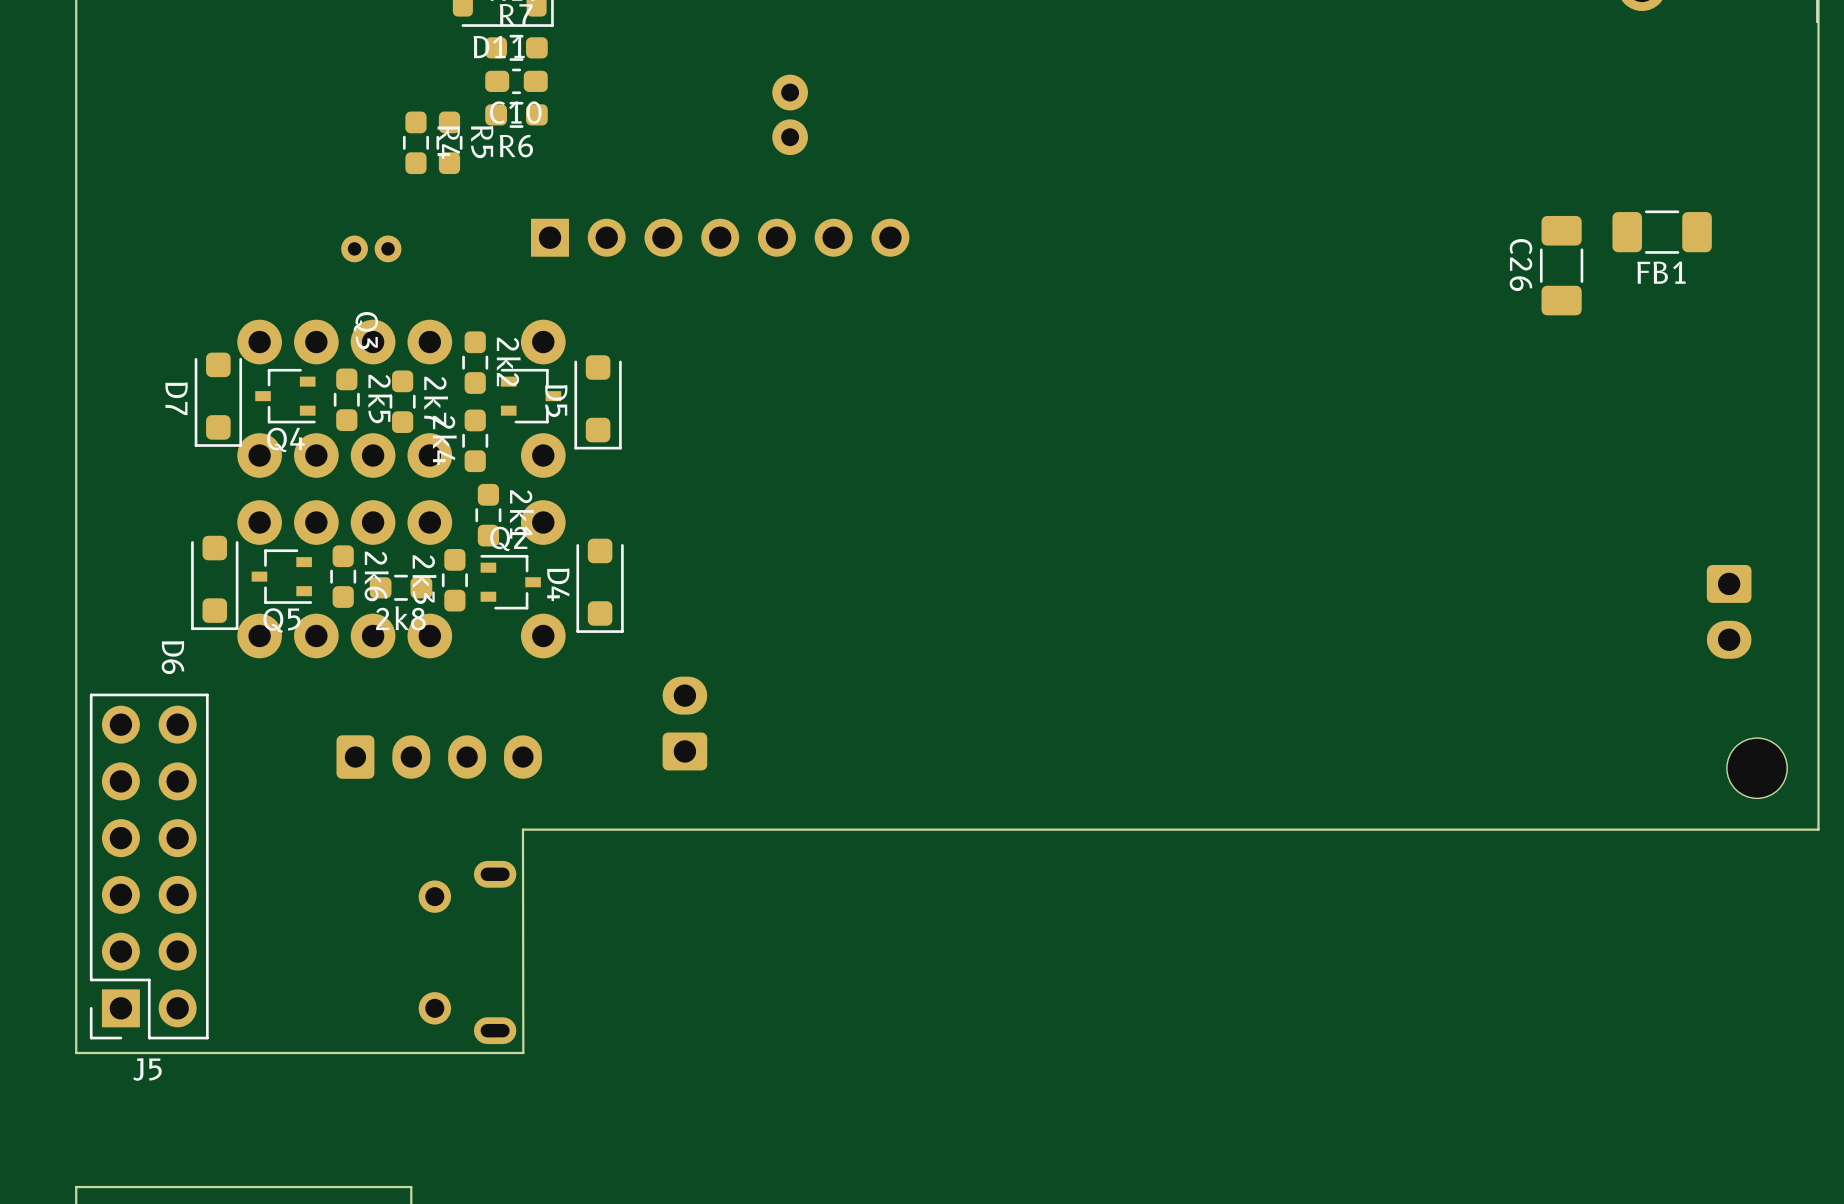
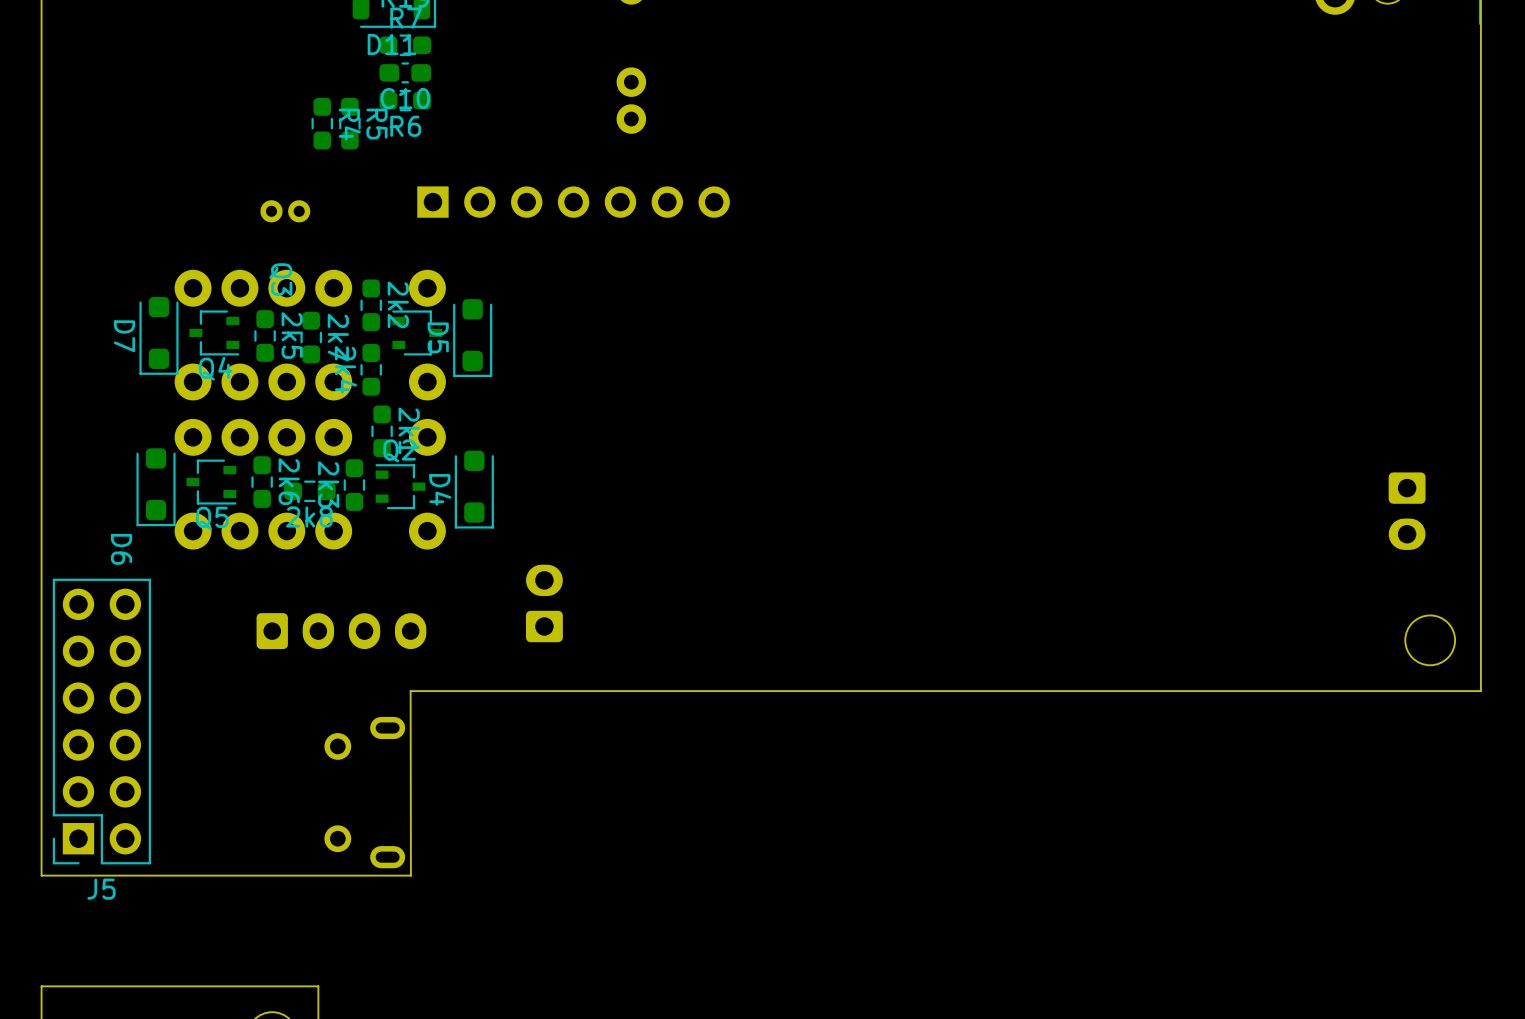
FB1: (1662, 232) -> none
C26: (1561, 265) -> none

